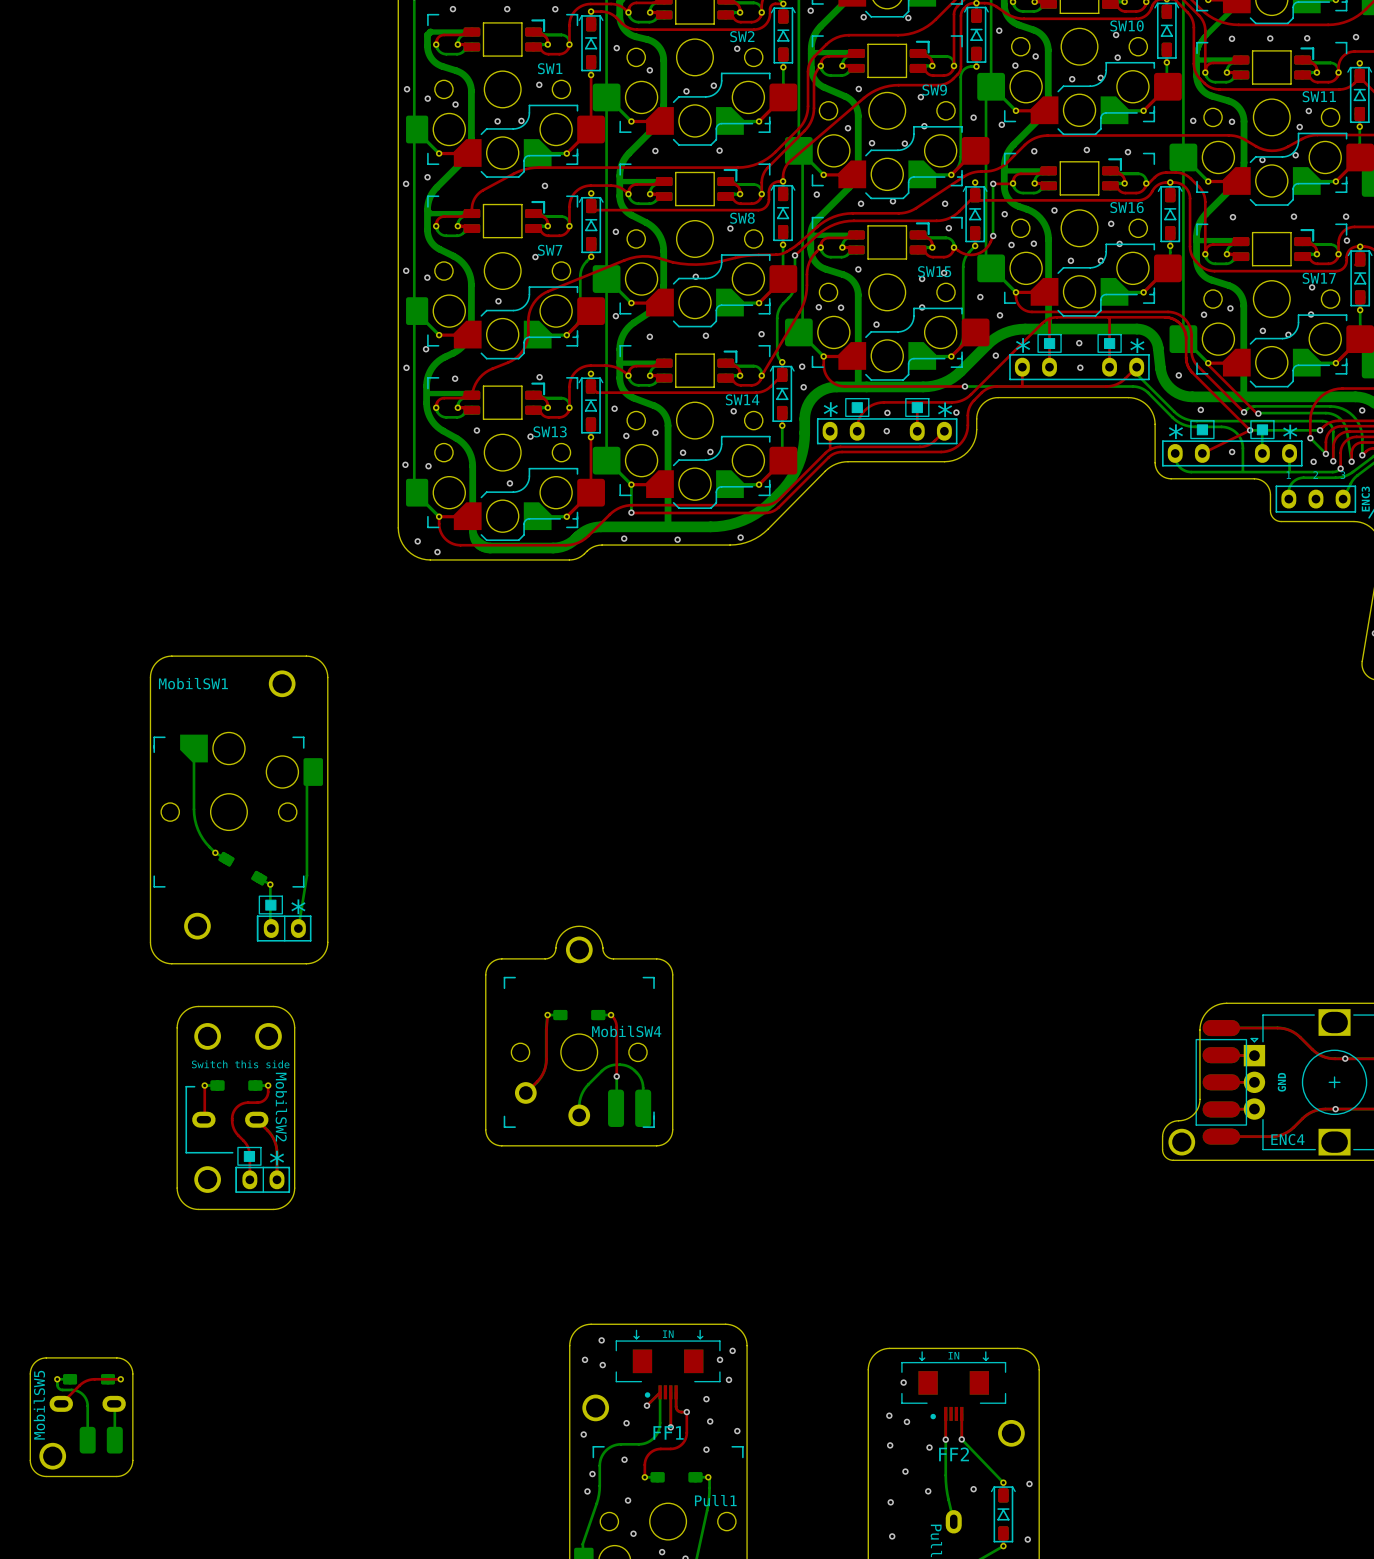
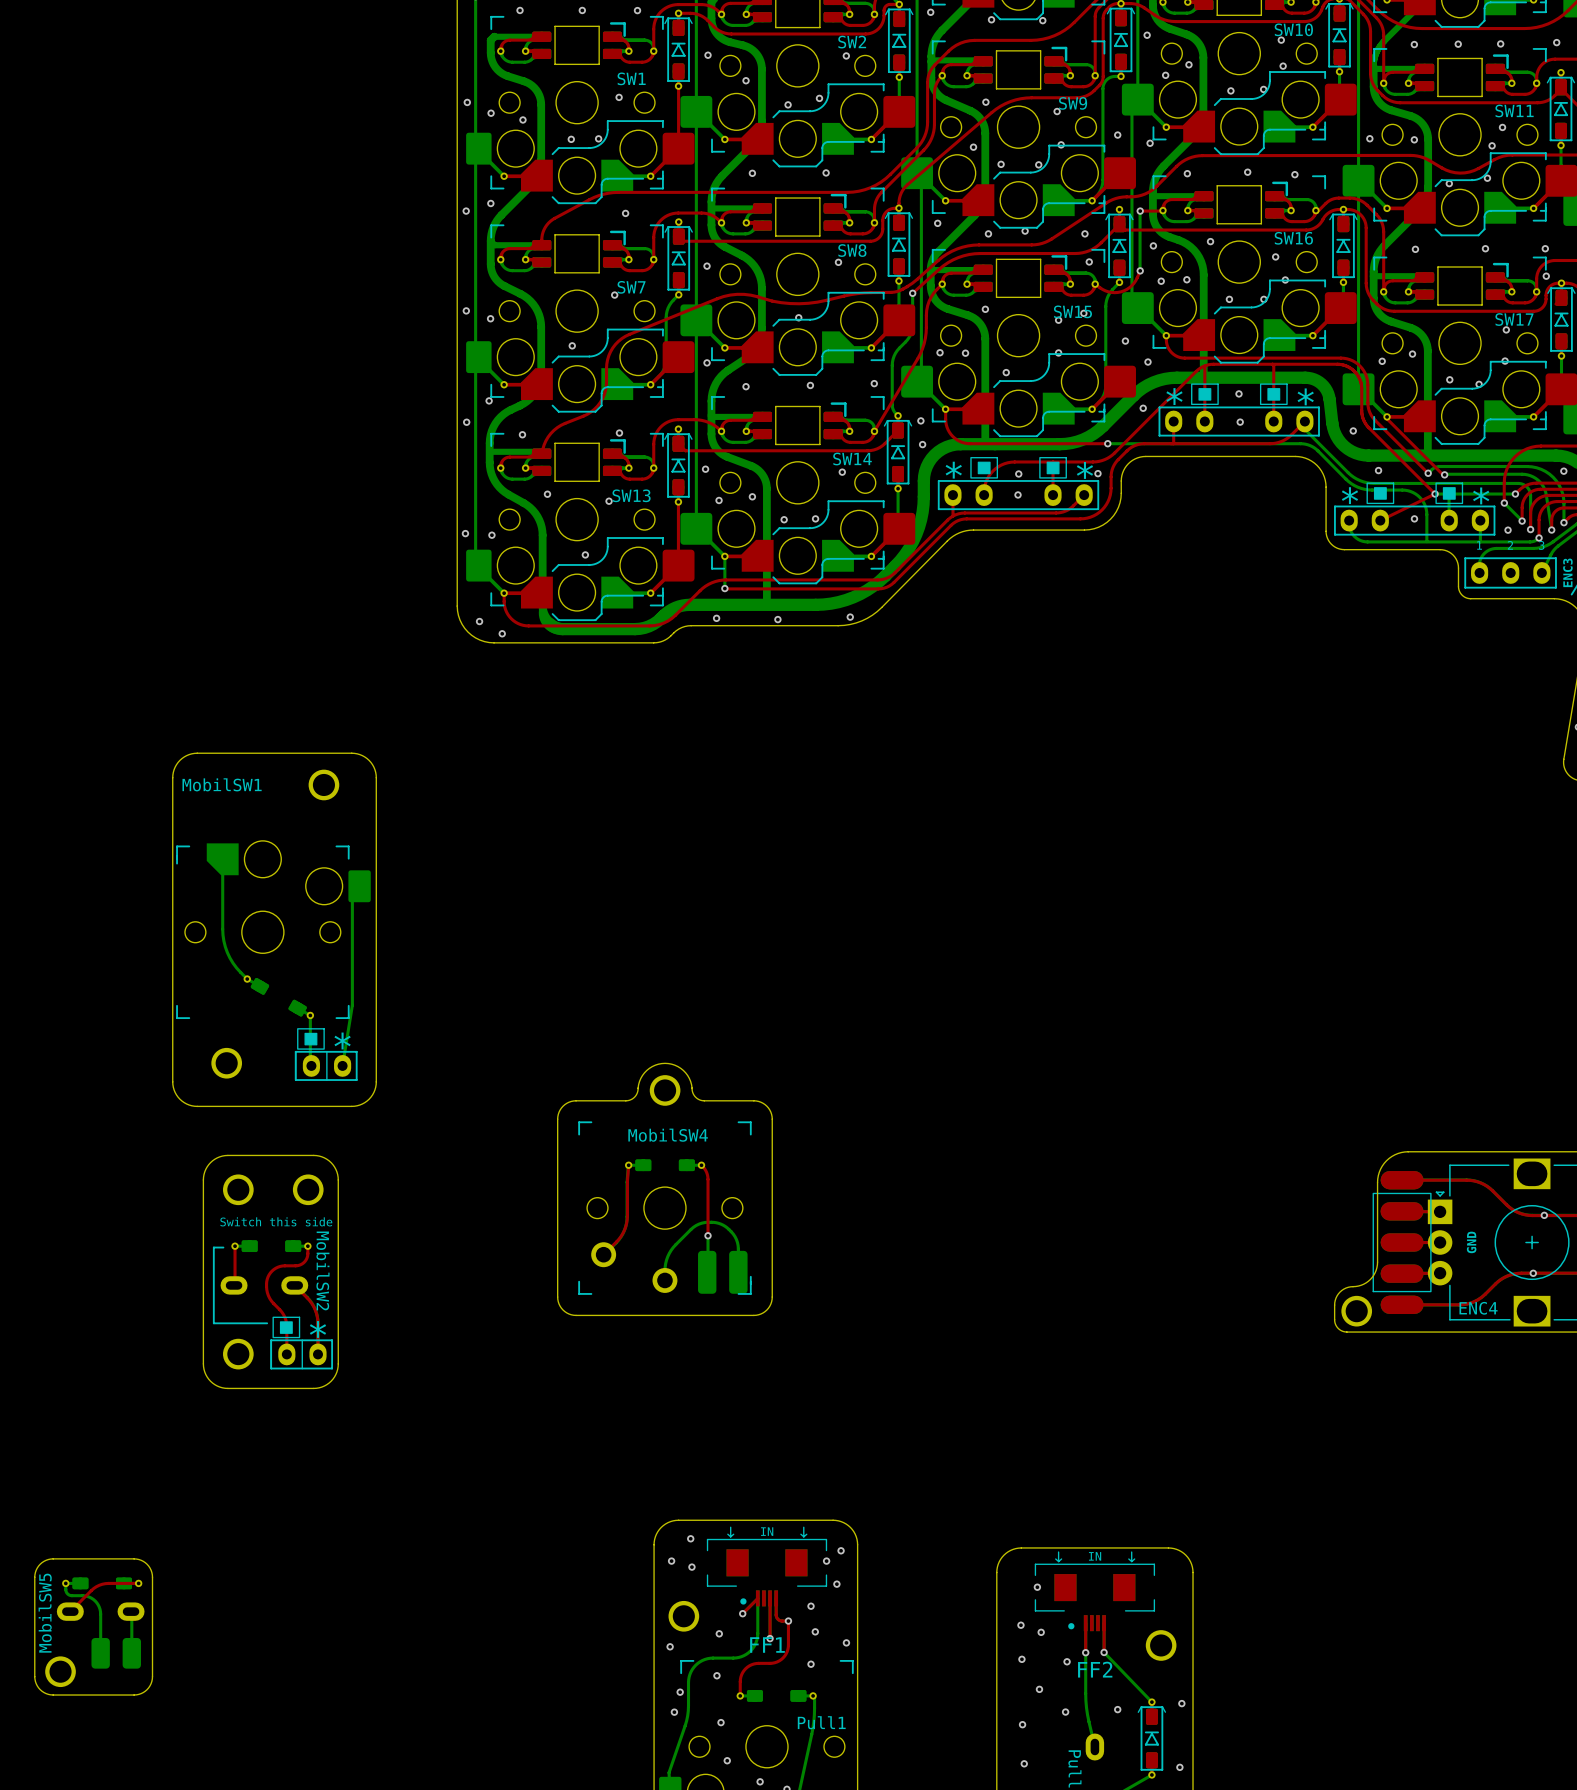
MobilSW4 name position: MobilSW4 (626, 1031) -> MobilSW4 (668, 1135)

